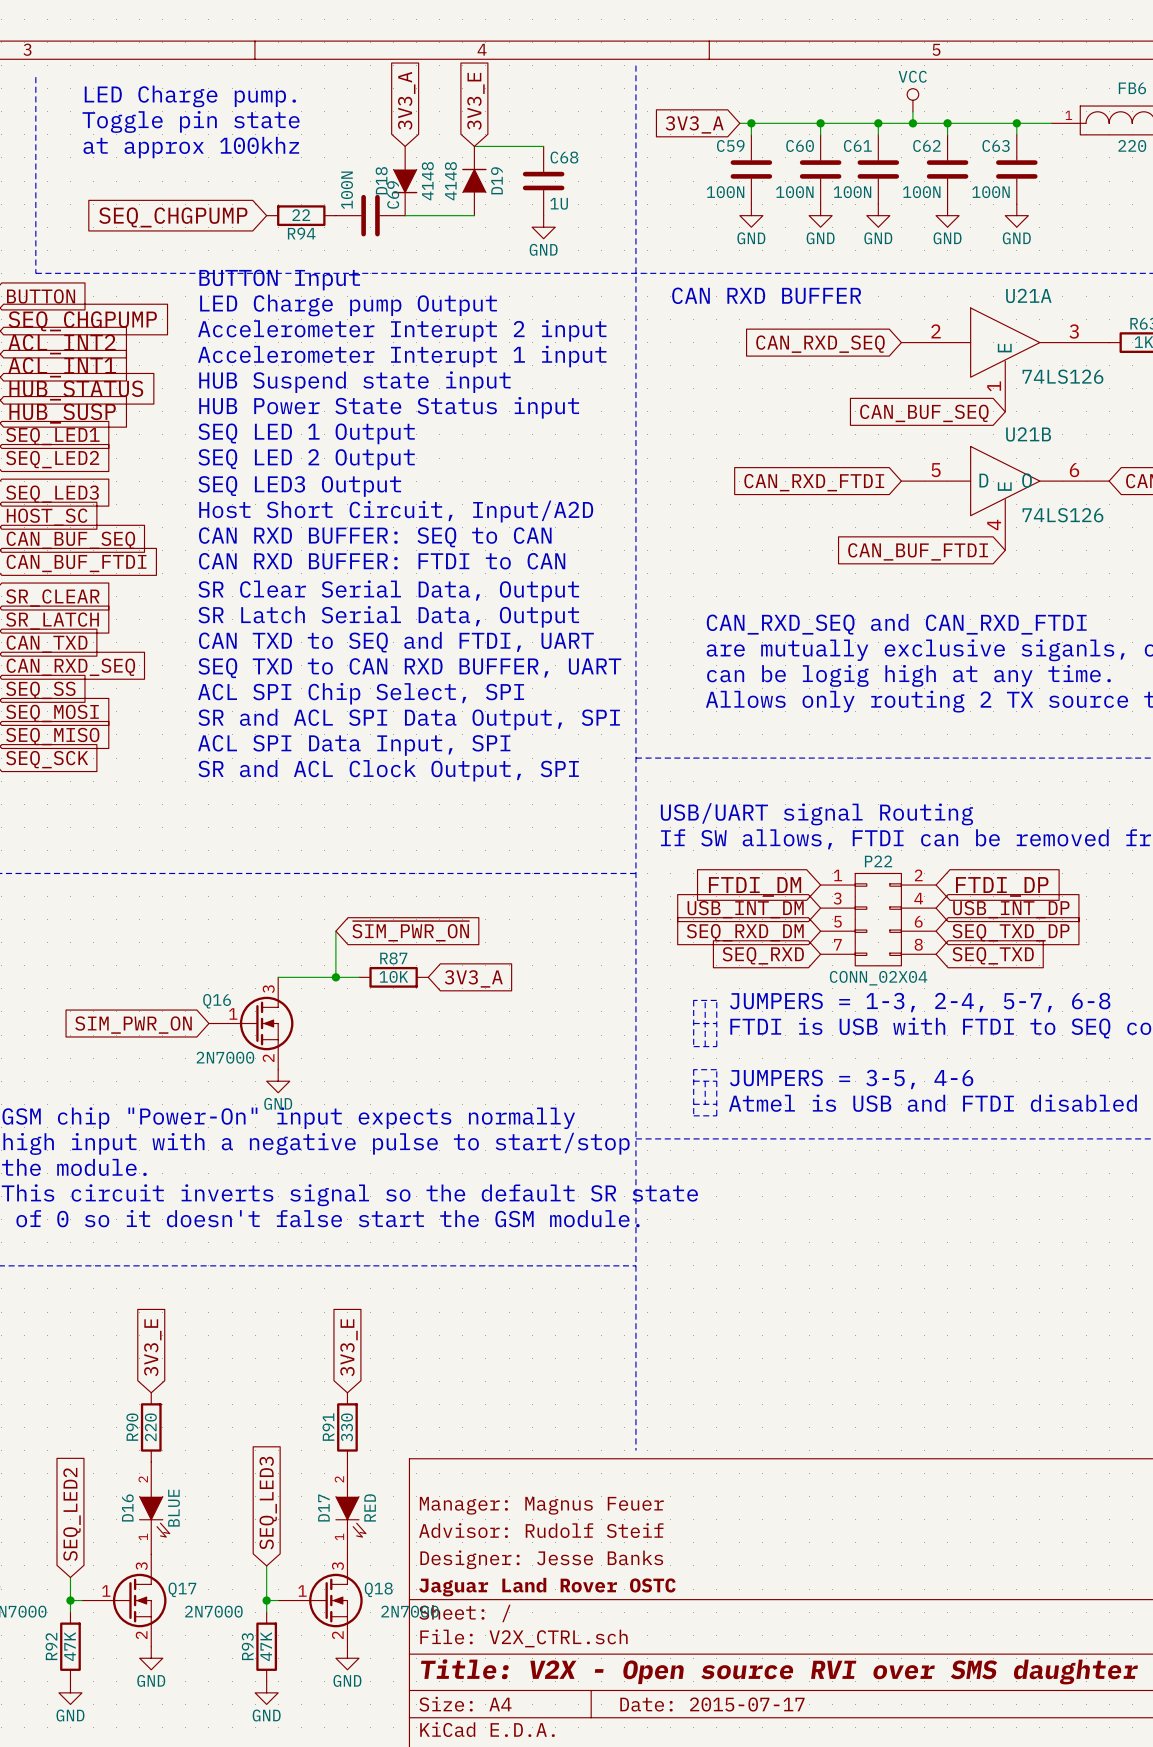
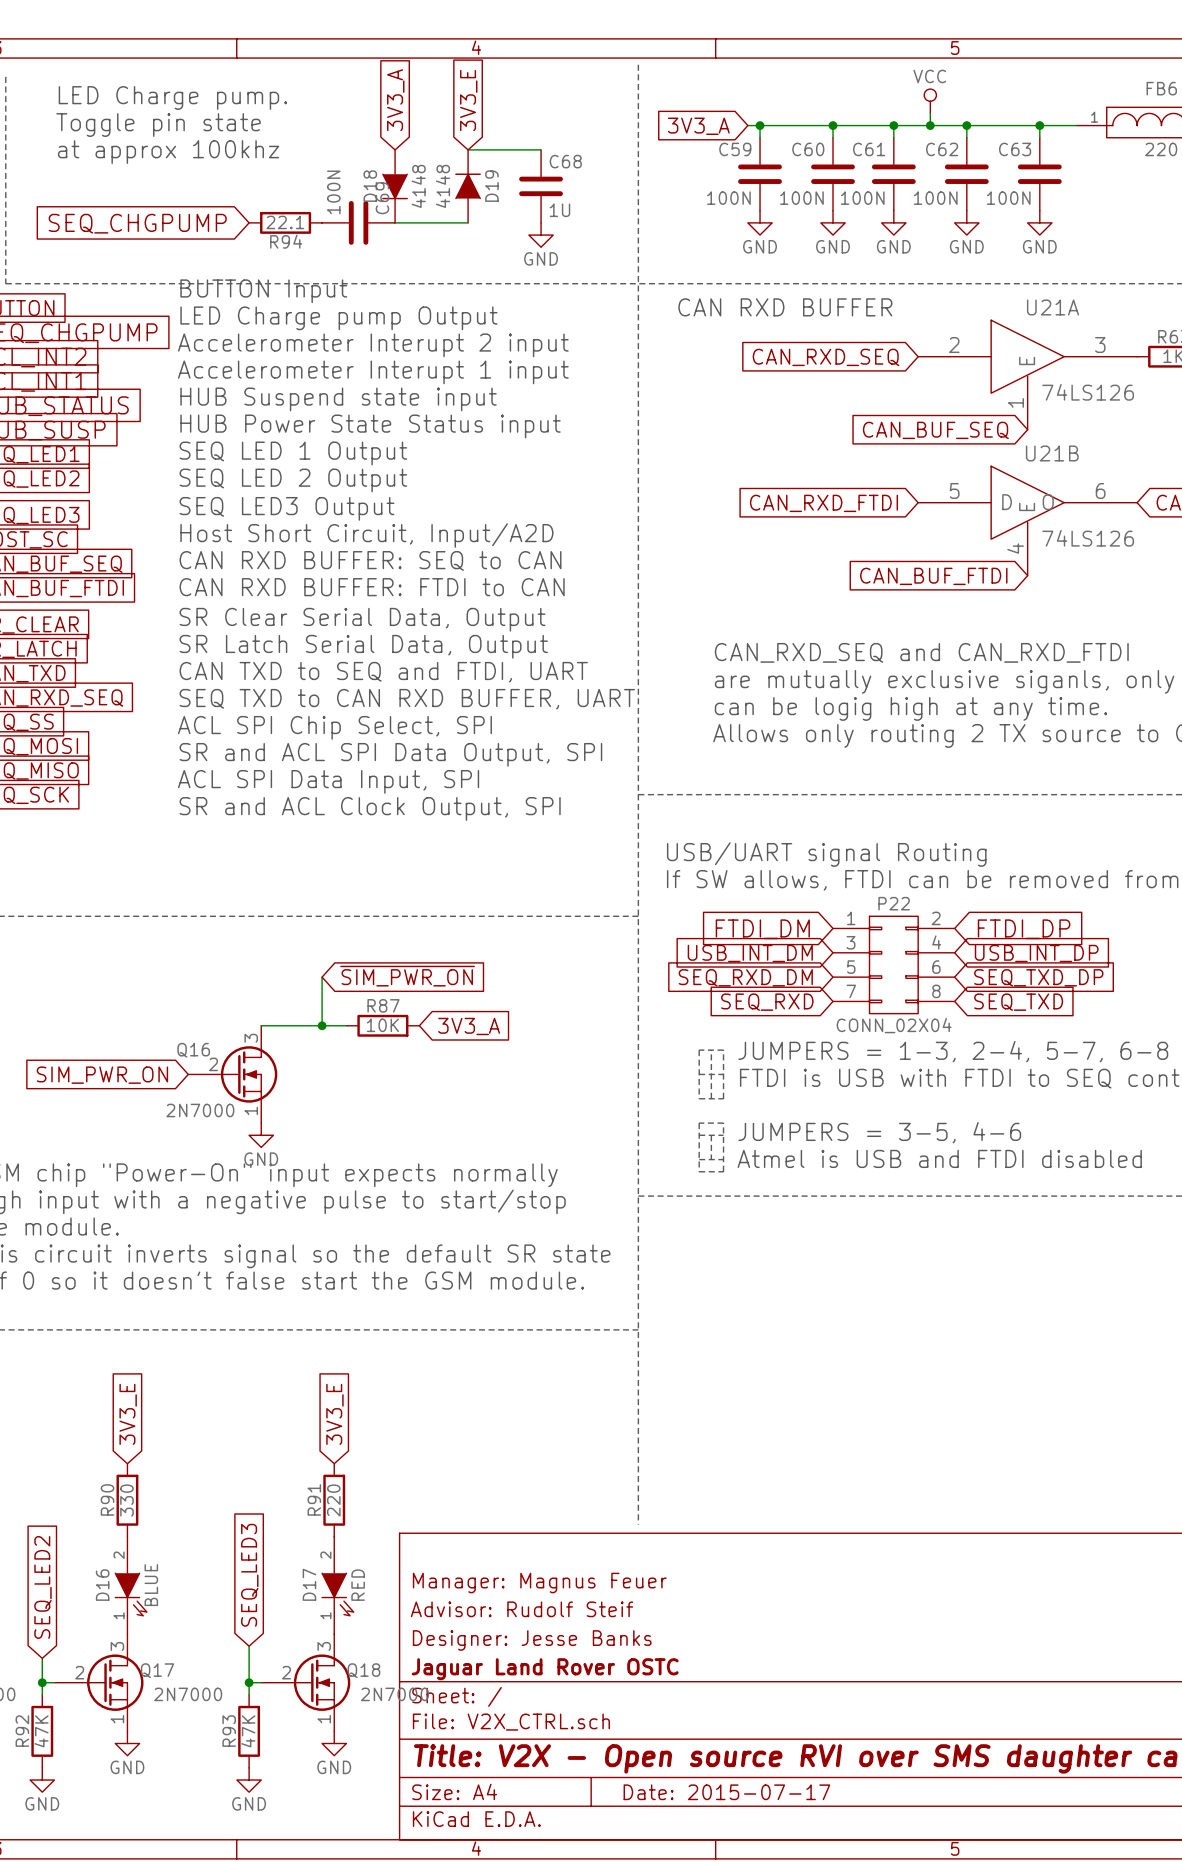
R94 value: 22 (301, 215) -> 22.1 (285, 222)
Q16 pin number: 1 (233, 1013) -> 2 (213, 1064)
Q16 pin number: 2 (268, 1058) -> 1 (251, 1110)
R90 value: 220 (150, 1427) -> 330 (126, 1500)
R91 value: 330 (347, 1427) -> 220 (333, 1500)
Q17 pin number: 1 (106, 1591) -> 2 (79, 1672)
Q18 pin number: 1 (302, 1591) -> 2 (286, 1672)
Q17 pin number: 2 (141, 1635) -> 1 (117, 1719)
Q18 pin number: 2 (337, 1635) -> 1 (324, 1719)

